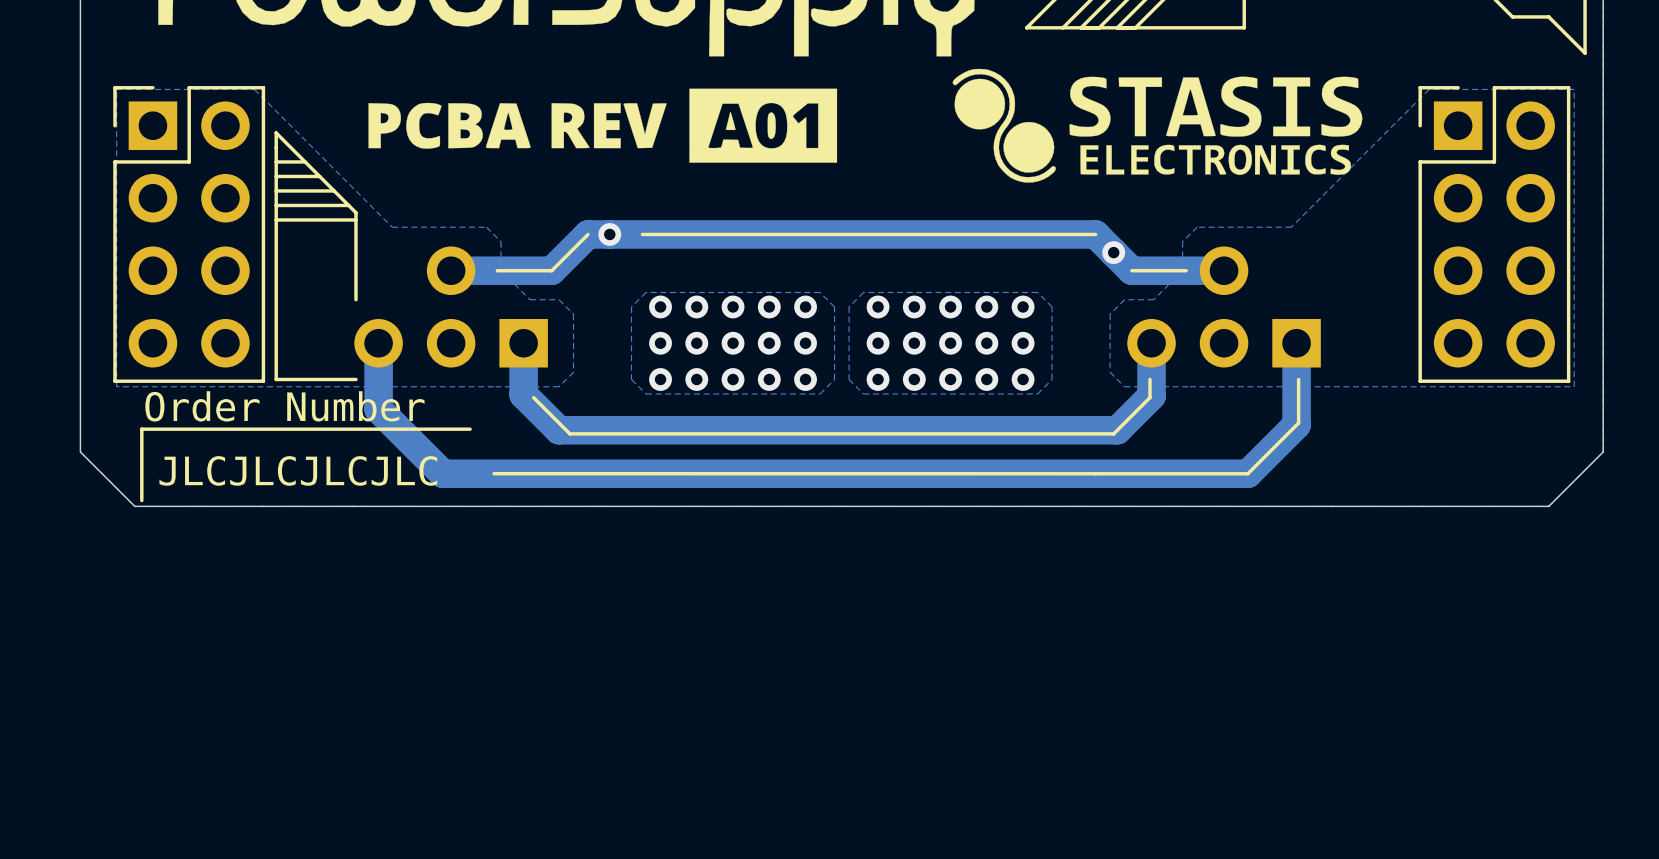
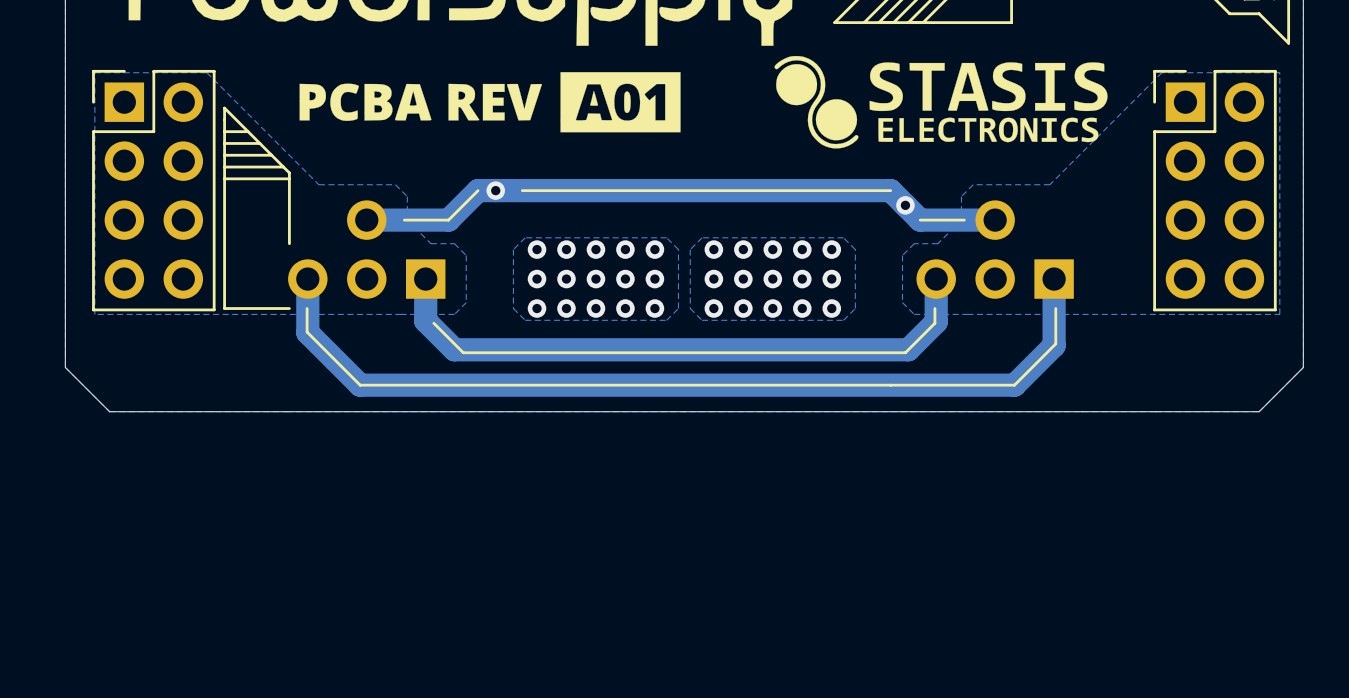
line: none -> (307, 308) (307, 332) (360, 385) (401, 385)
text: Order Number (284, 406) -> none
line: (470, 429) (141, 429) (141, 500) -> none
text: JLCJLCJLCJLC (298, 470) -> none

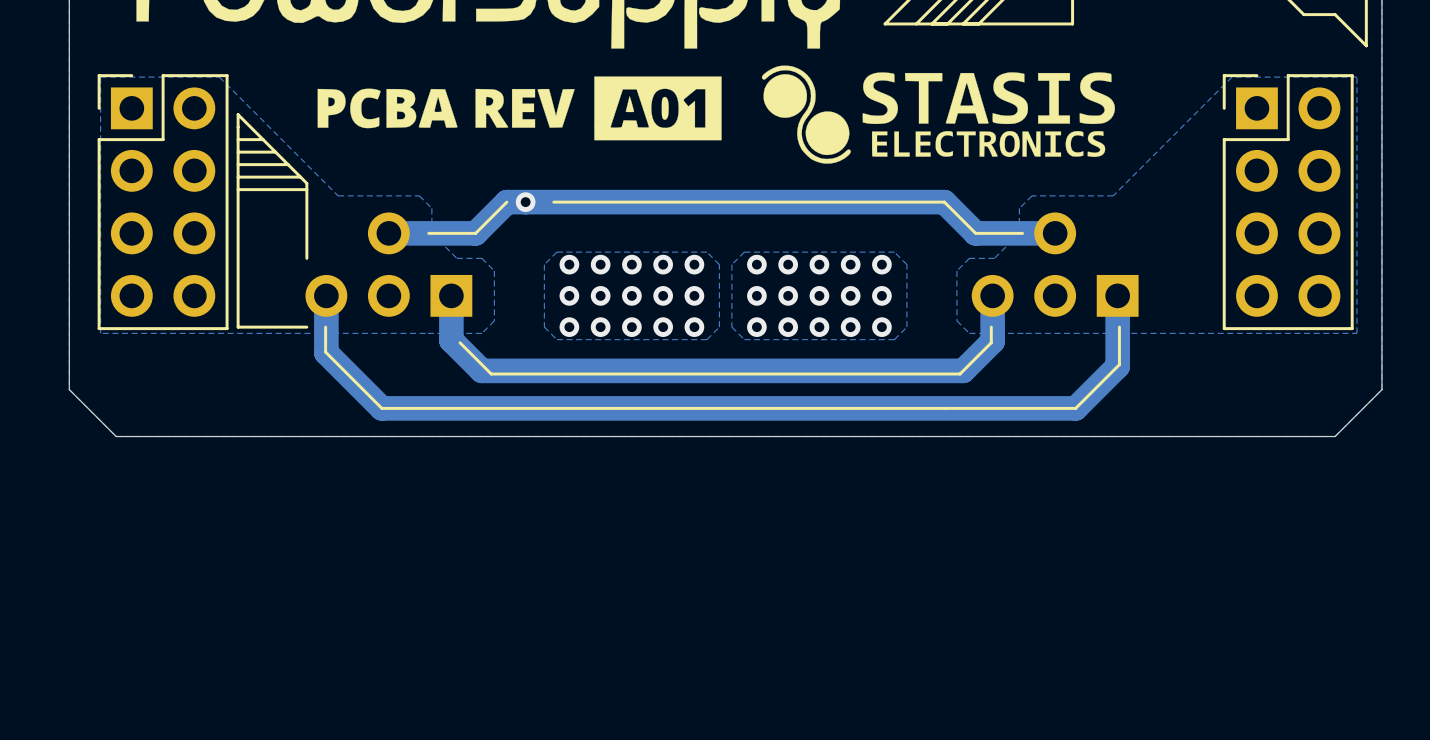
drawing position: (941, 102) -> (938, 114)
line: none -> (944, 202) (975, 233)
via: (905, 205) -> none

